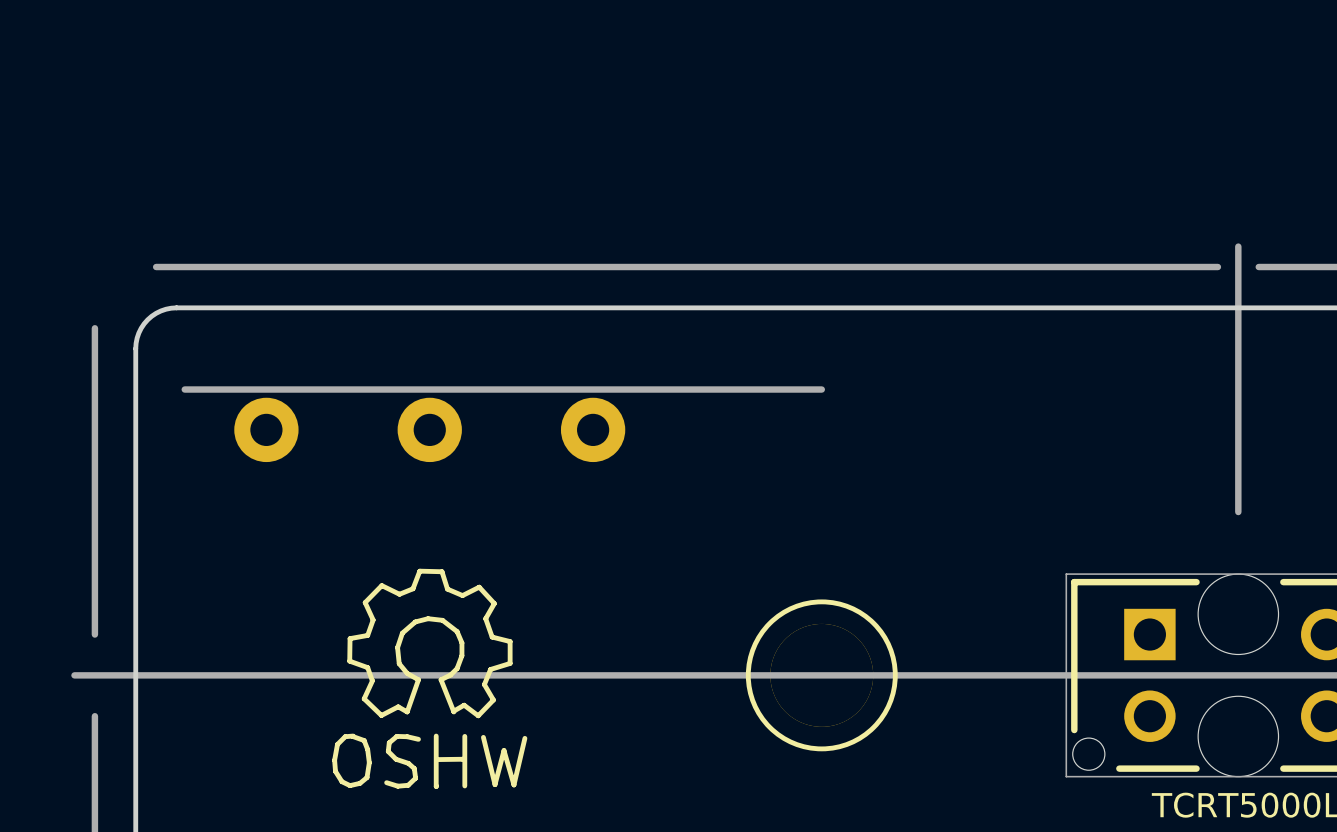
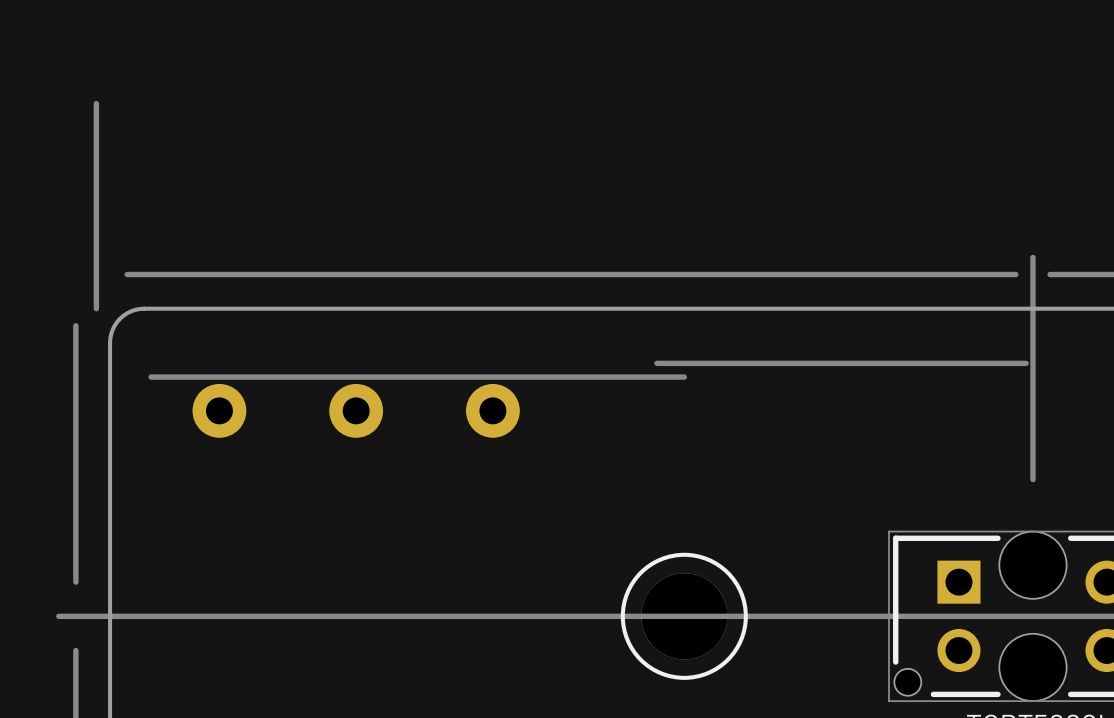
line: none -> (96, 103) (96, 308)
line: none -> (656, 363) (1026, 363)
drawing: [332, 568, 528, 789] -> none

